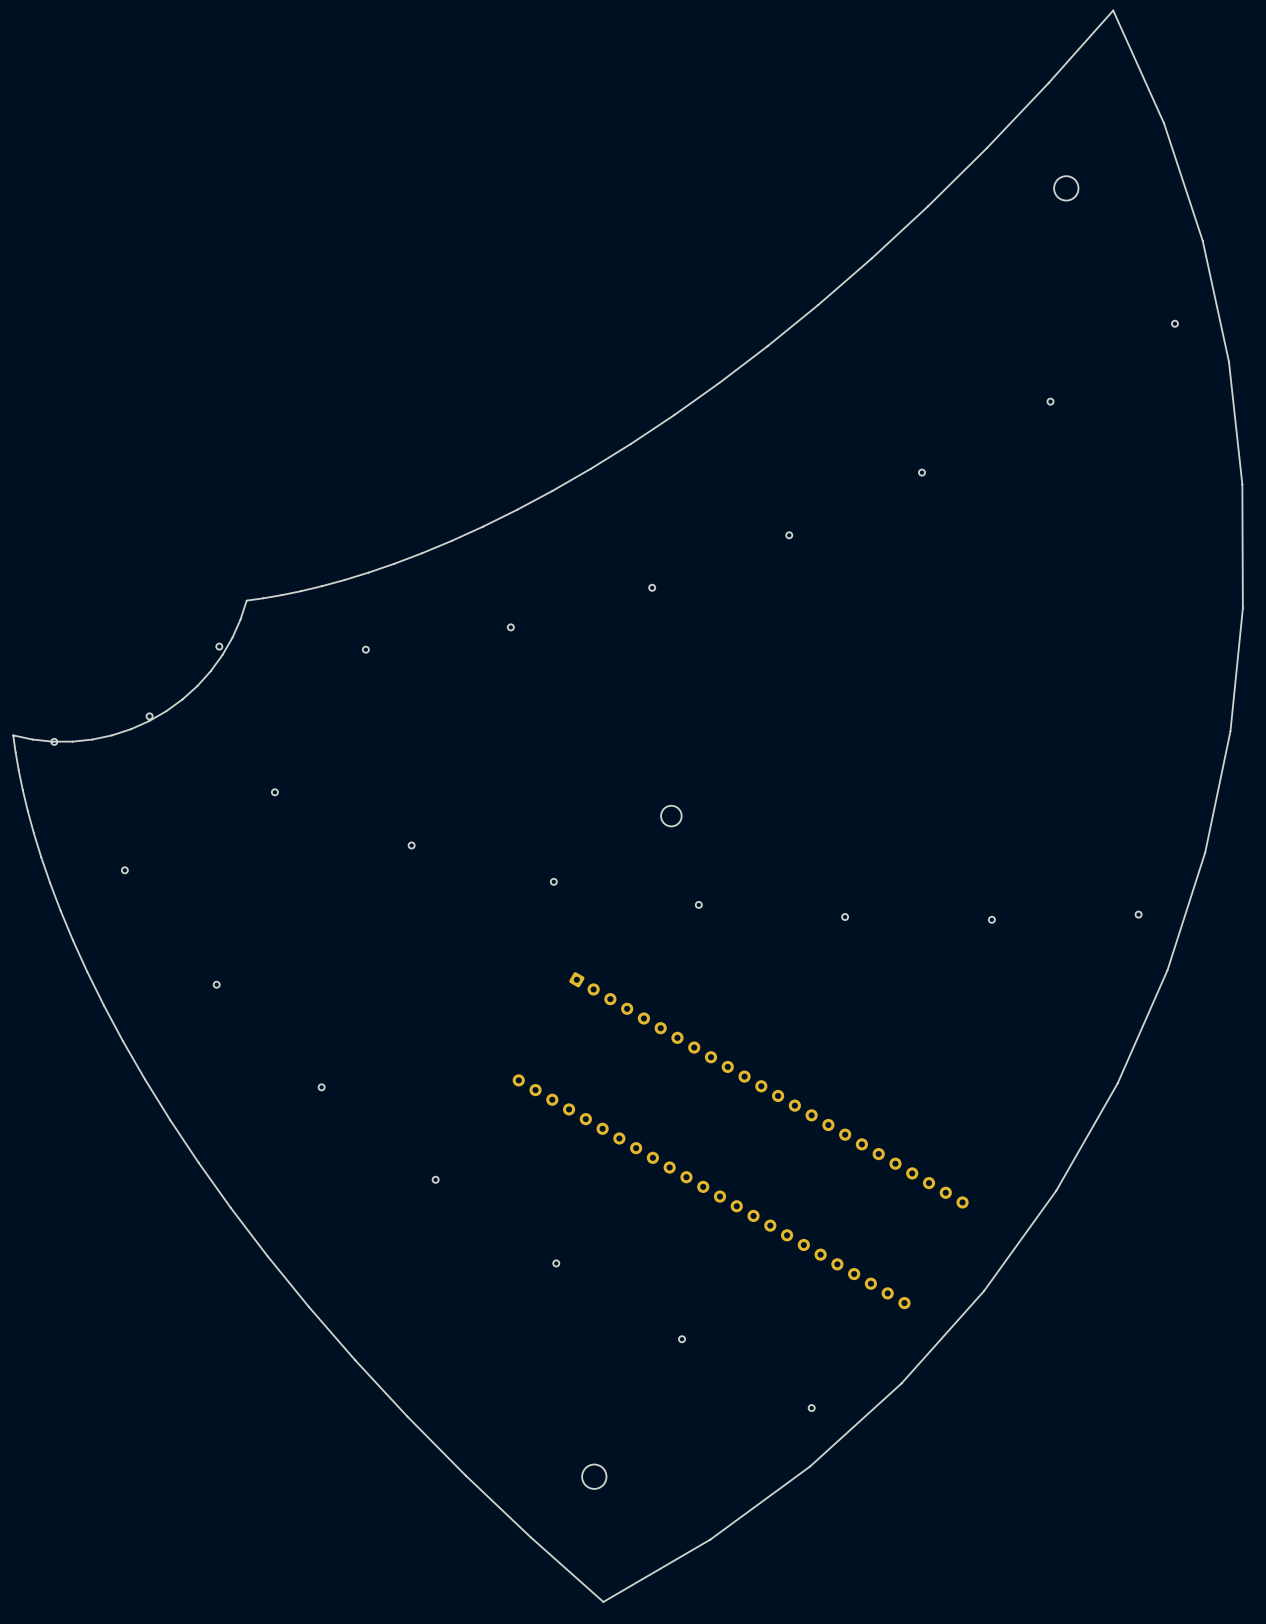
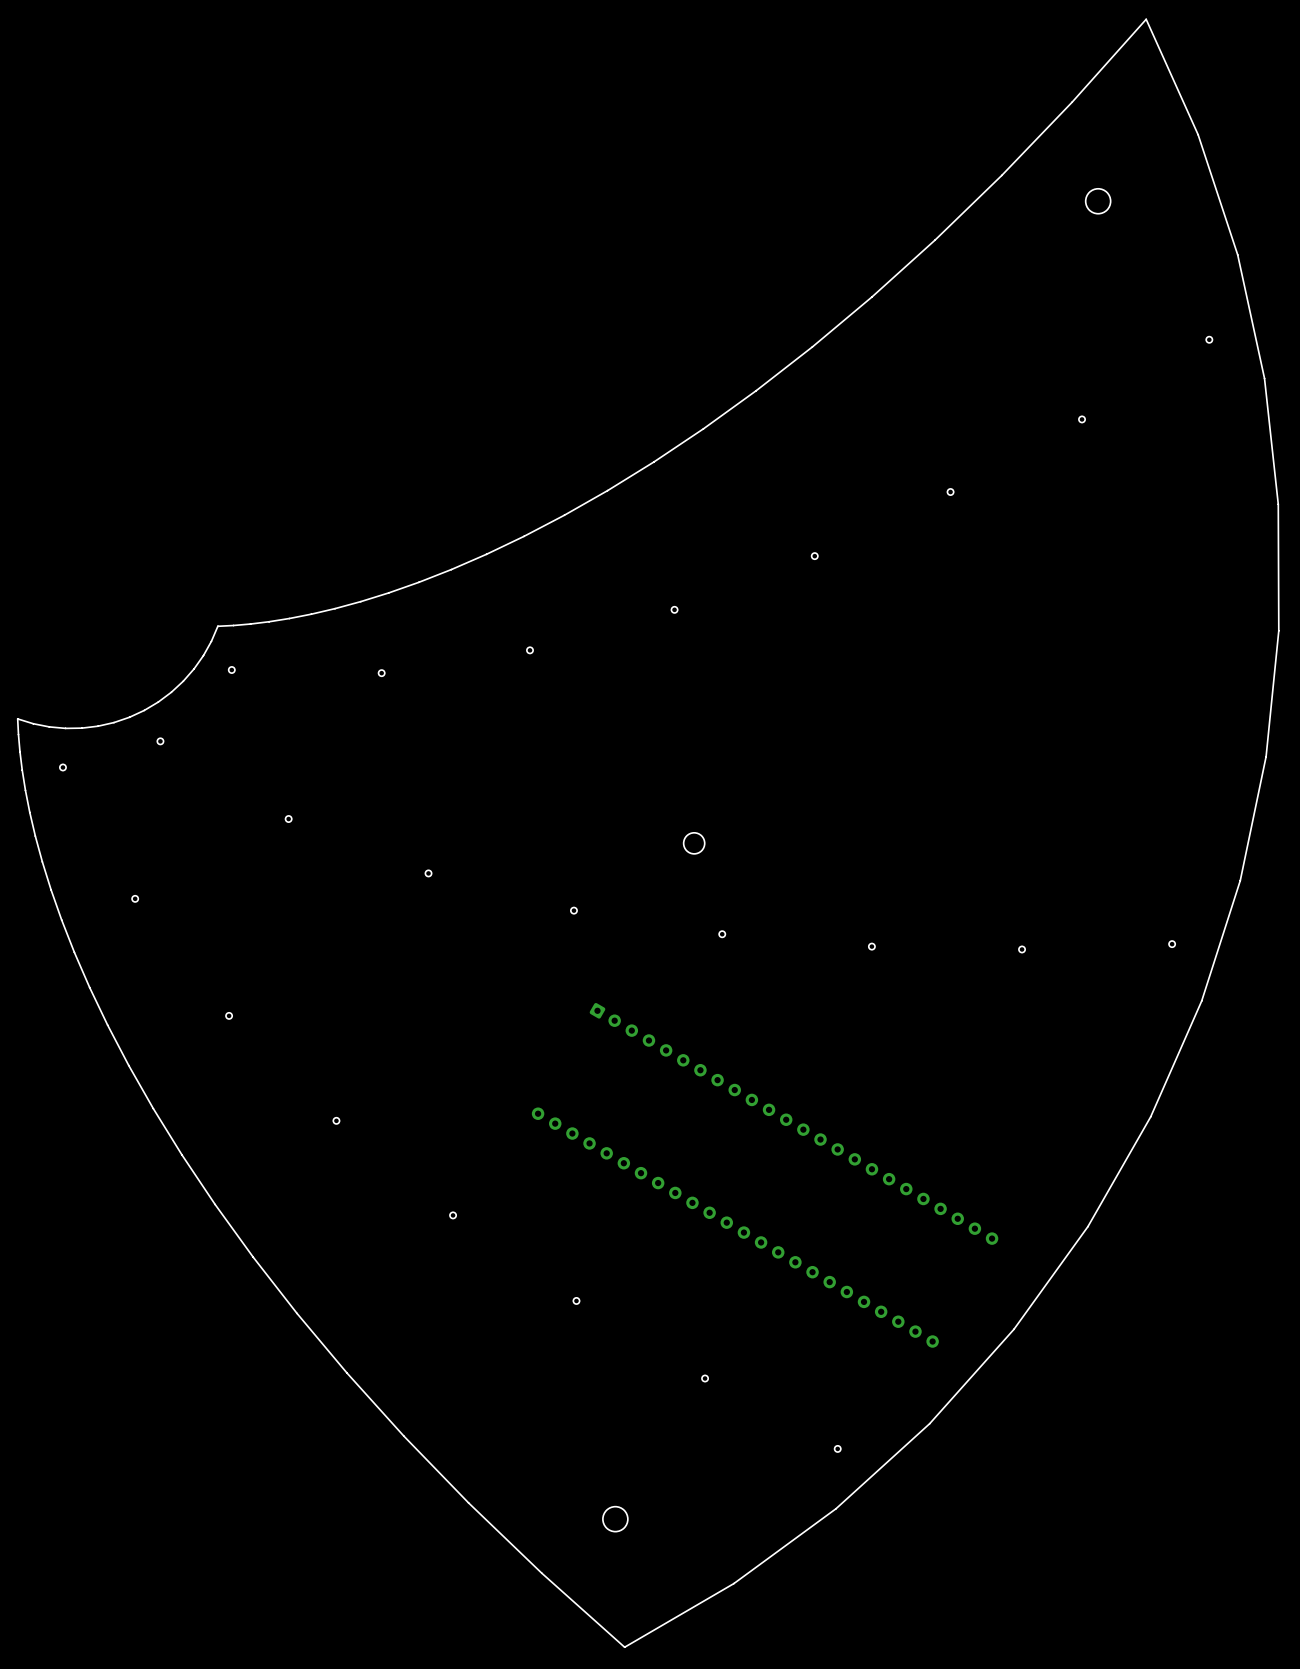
board edge: (1113, 10) (986, 148) (871, 258) (767, 346) (719, 382) (631, 443) (516, 509) (422, 553) (368, 572) (322, 586) (246, 600) (232, 637) (210, 671) (182, 699) (149, 721) (111, 735) (72, 741) (32, 739) (13, 735) (22, 789) (33, 833) (50, 883) (72, 940) (123, 1041) (170, 1119) (198, 1162) (267, 1256) (355, 1360) (465, 1475) (603, 1601) -> (1146, 19) (1072, 102) (1001, 175) (935, 240) (871, 297) (756, 390) (654, 461) (607, 490) (523, 536) (418, 582) (360, 601) (311, 614) (269, 621) (217, 626) (203, 655) (183, 681) (158, 702) (129, 717) (98, 726) (65, 728) (49, 726) (17, 718) (22, 770) (29, 812) (42, 861) (61, 919) (107, 1025) (153, 1108) (182, 1155) (253, 1257) (346, 1373) (403, 1436) (468, 1502) (541, 1573) (624, 1647)

